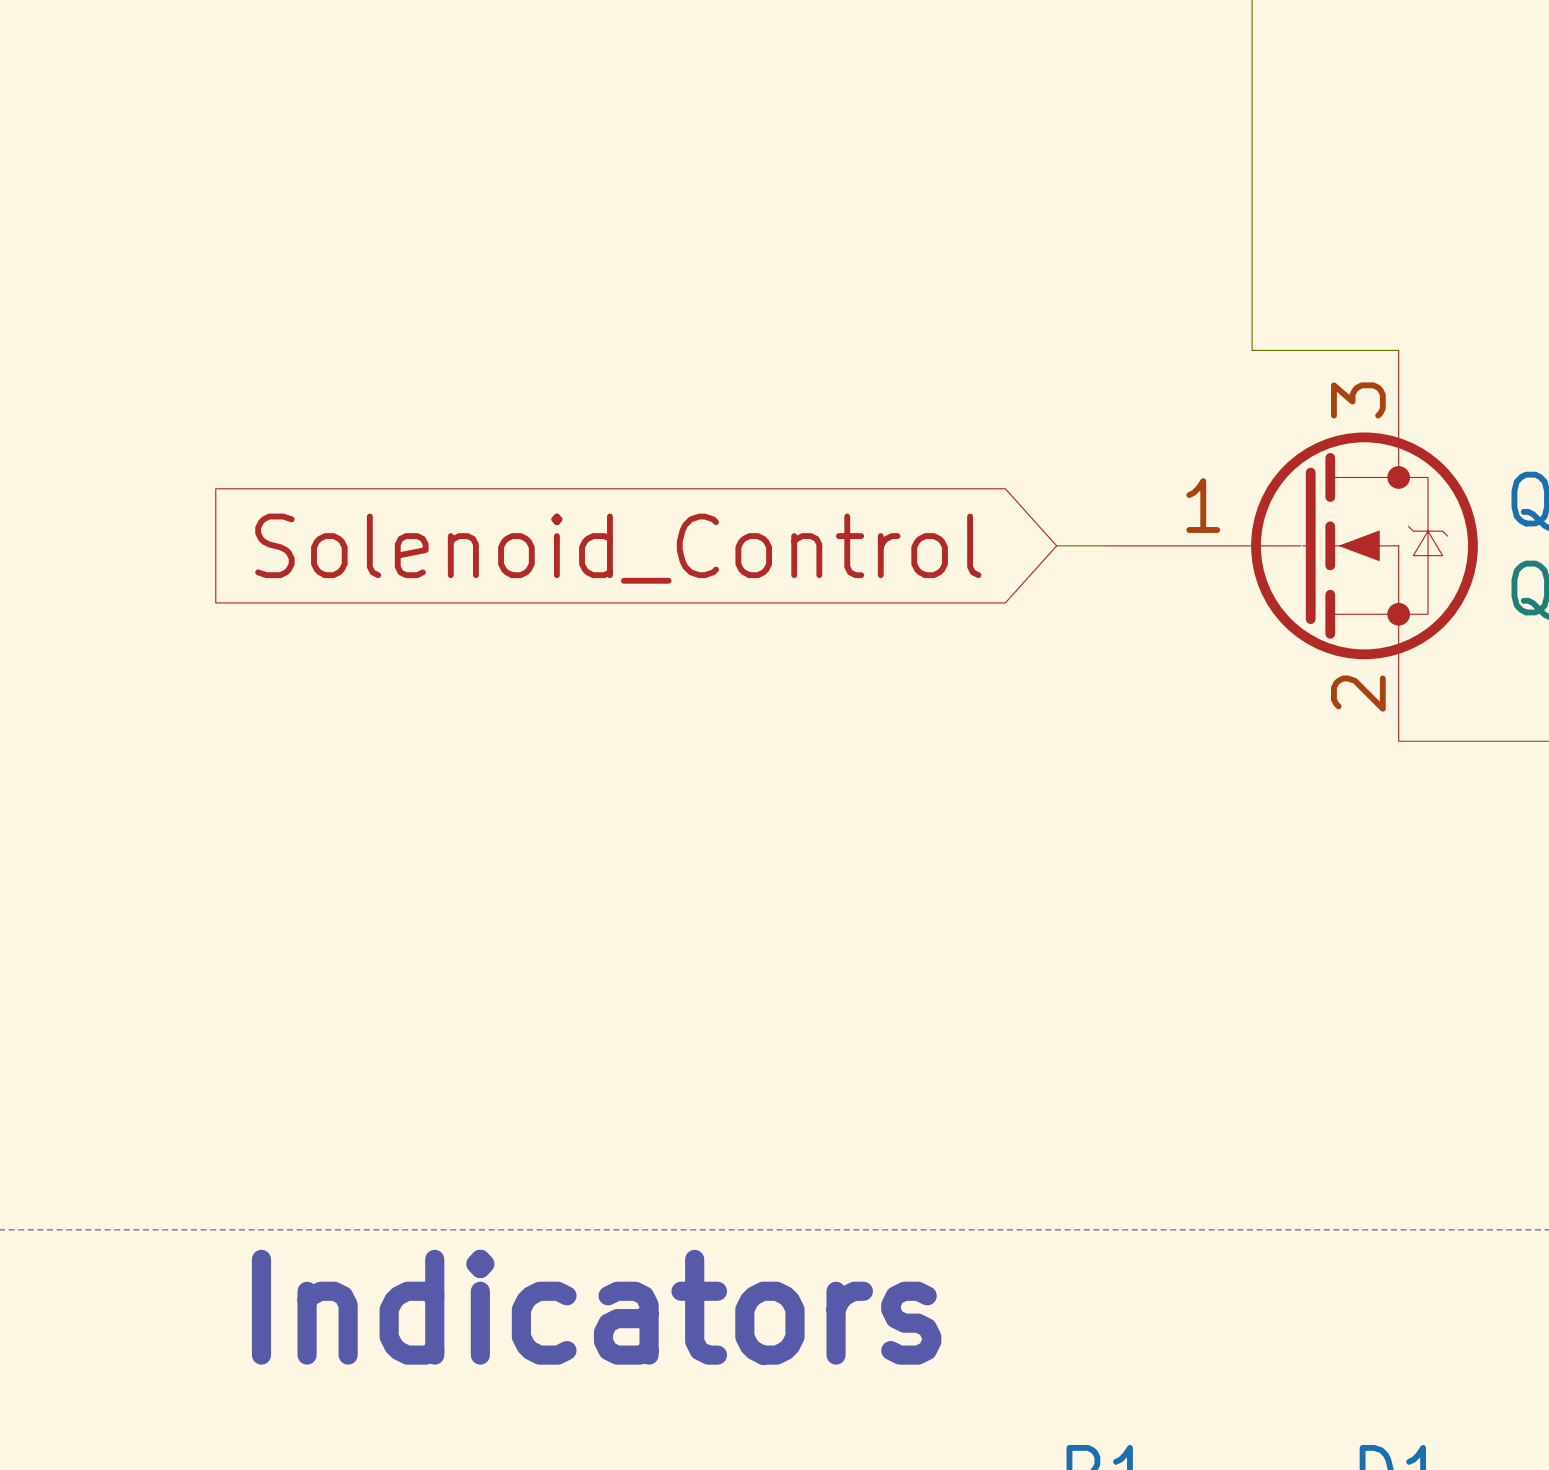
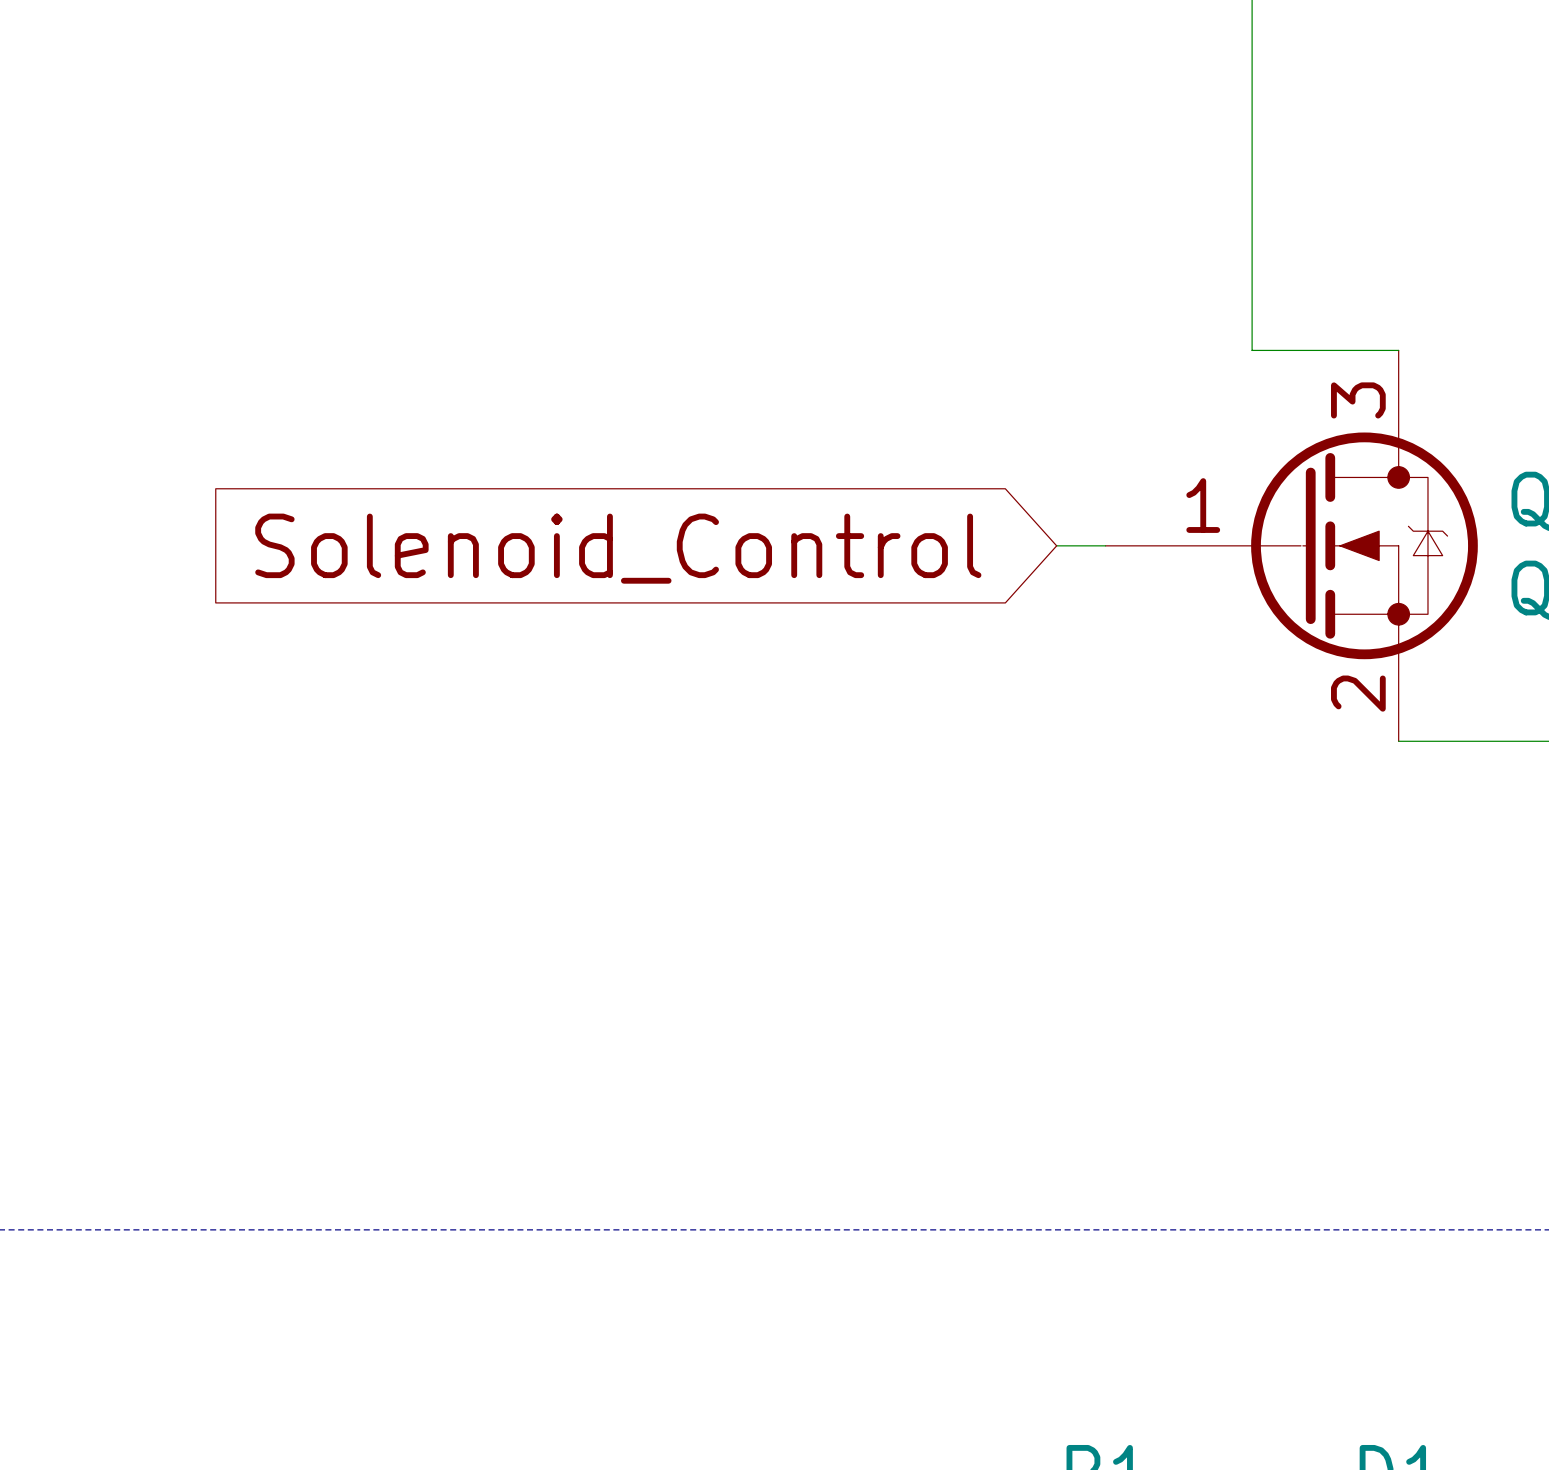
text: Indicators (596, 1307) -> none

